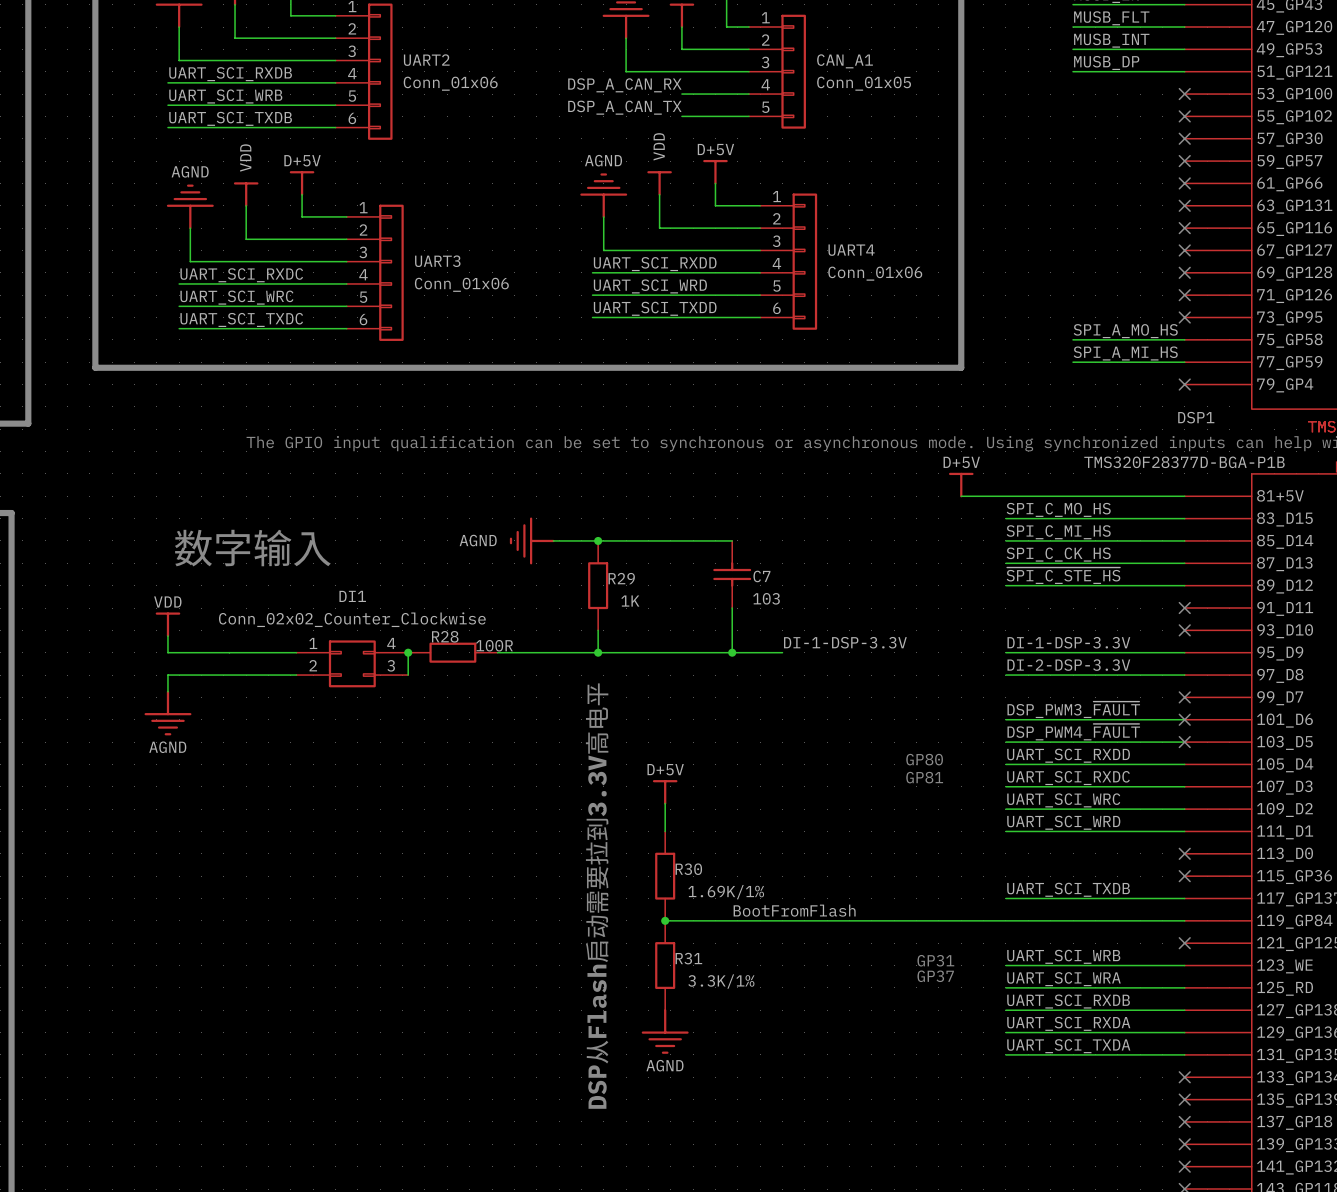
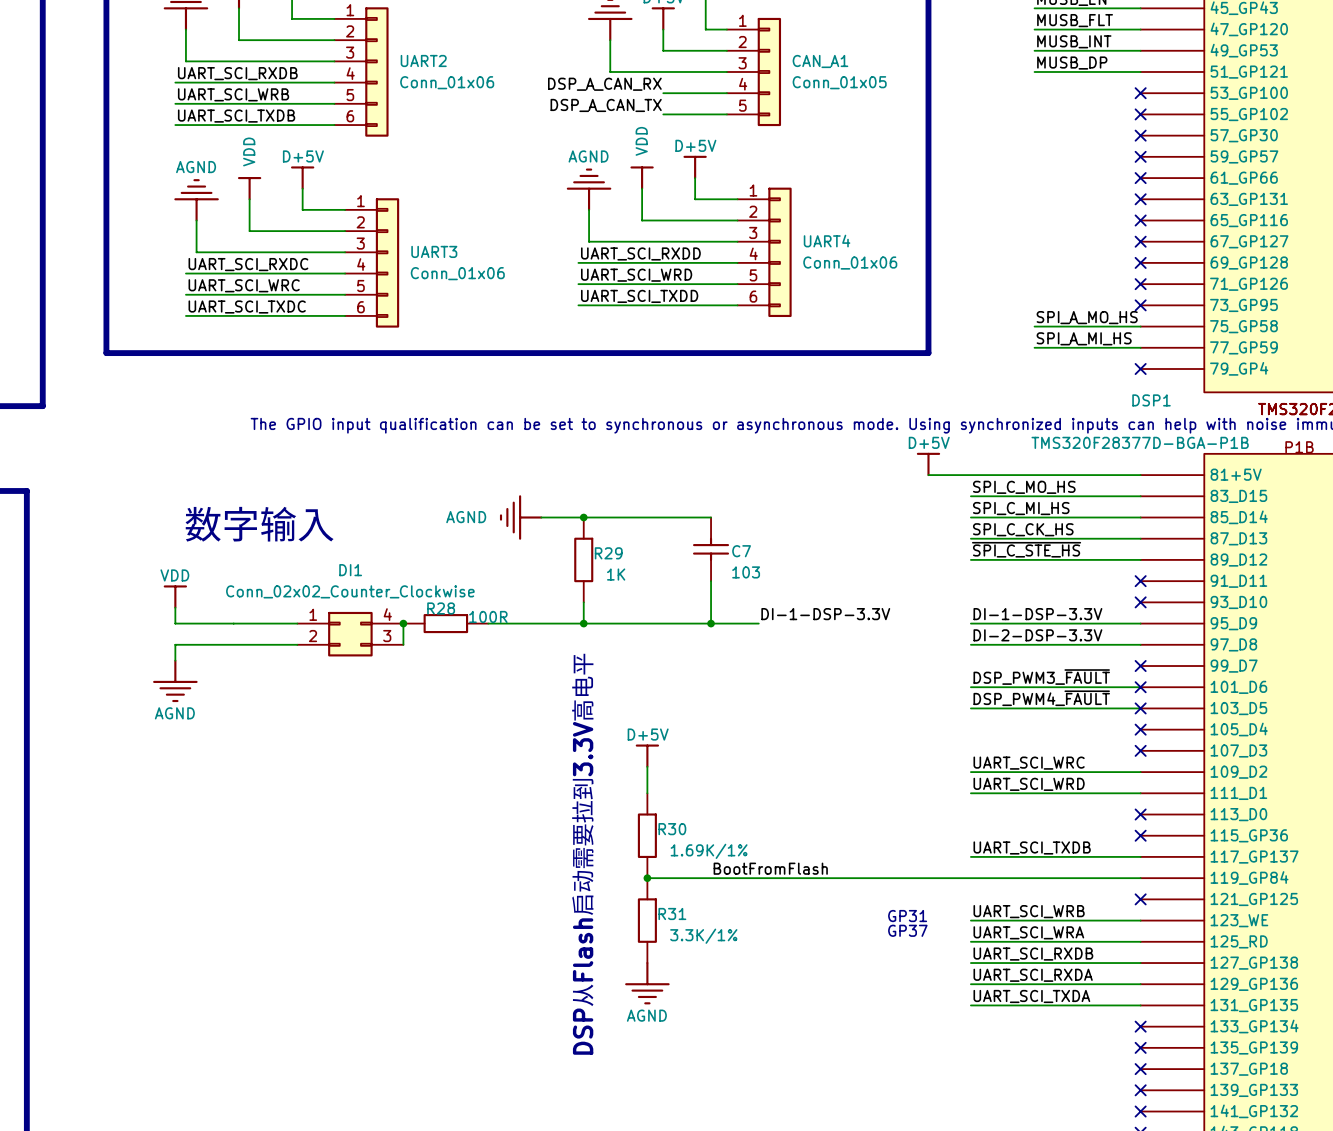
label: UART_SCI_RXDD (1068, 755) -> none
text: GP80 (924, 759) -> none
wire: (1005, 764) (1184, 764) -> none
no-connect mark: none -> (1140, 729)
text: GP81 (924, 777) -> none
label: UART_SCI_RXDC (1068, 778) -> none
wire: (1005, 786) (1184, 786) -> none
no-connect mark: none -> (1140, 750)

